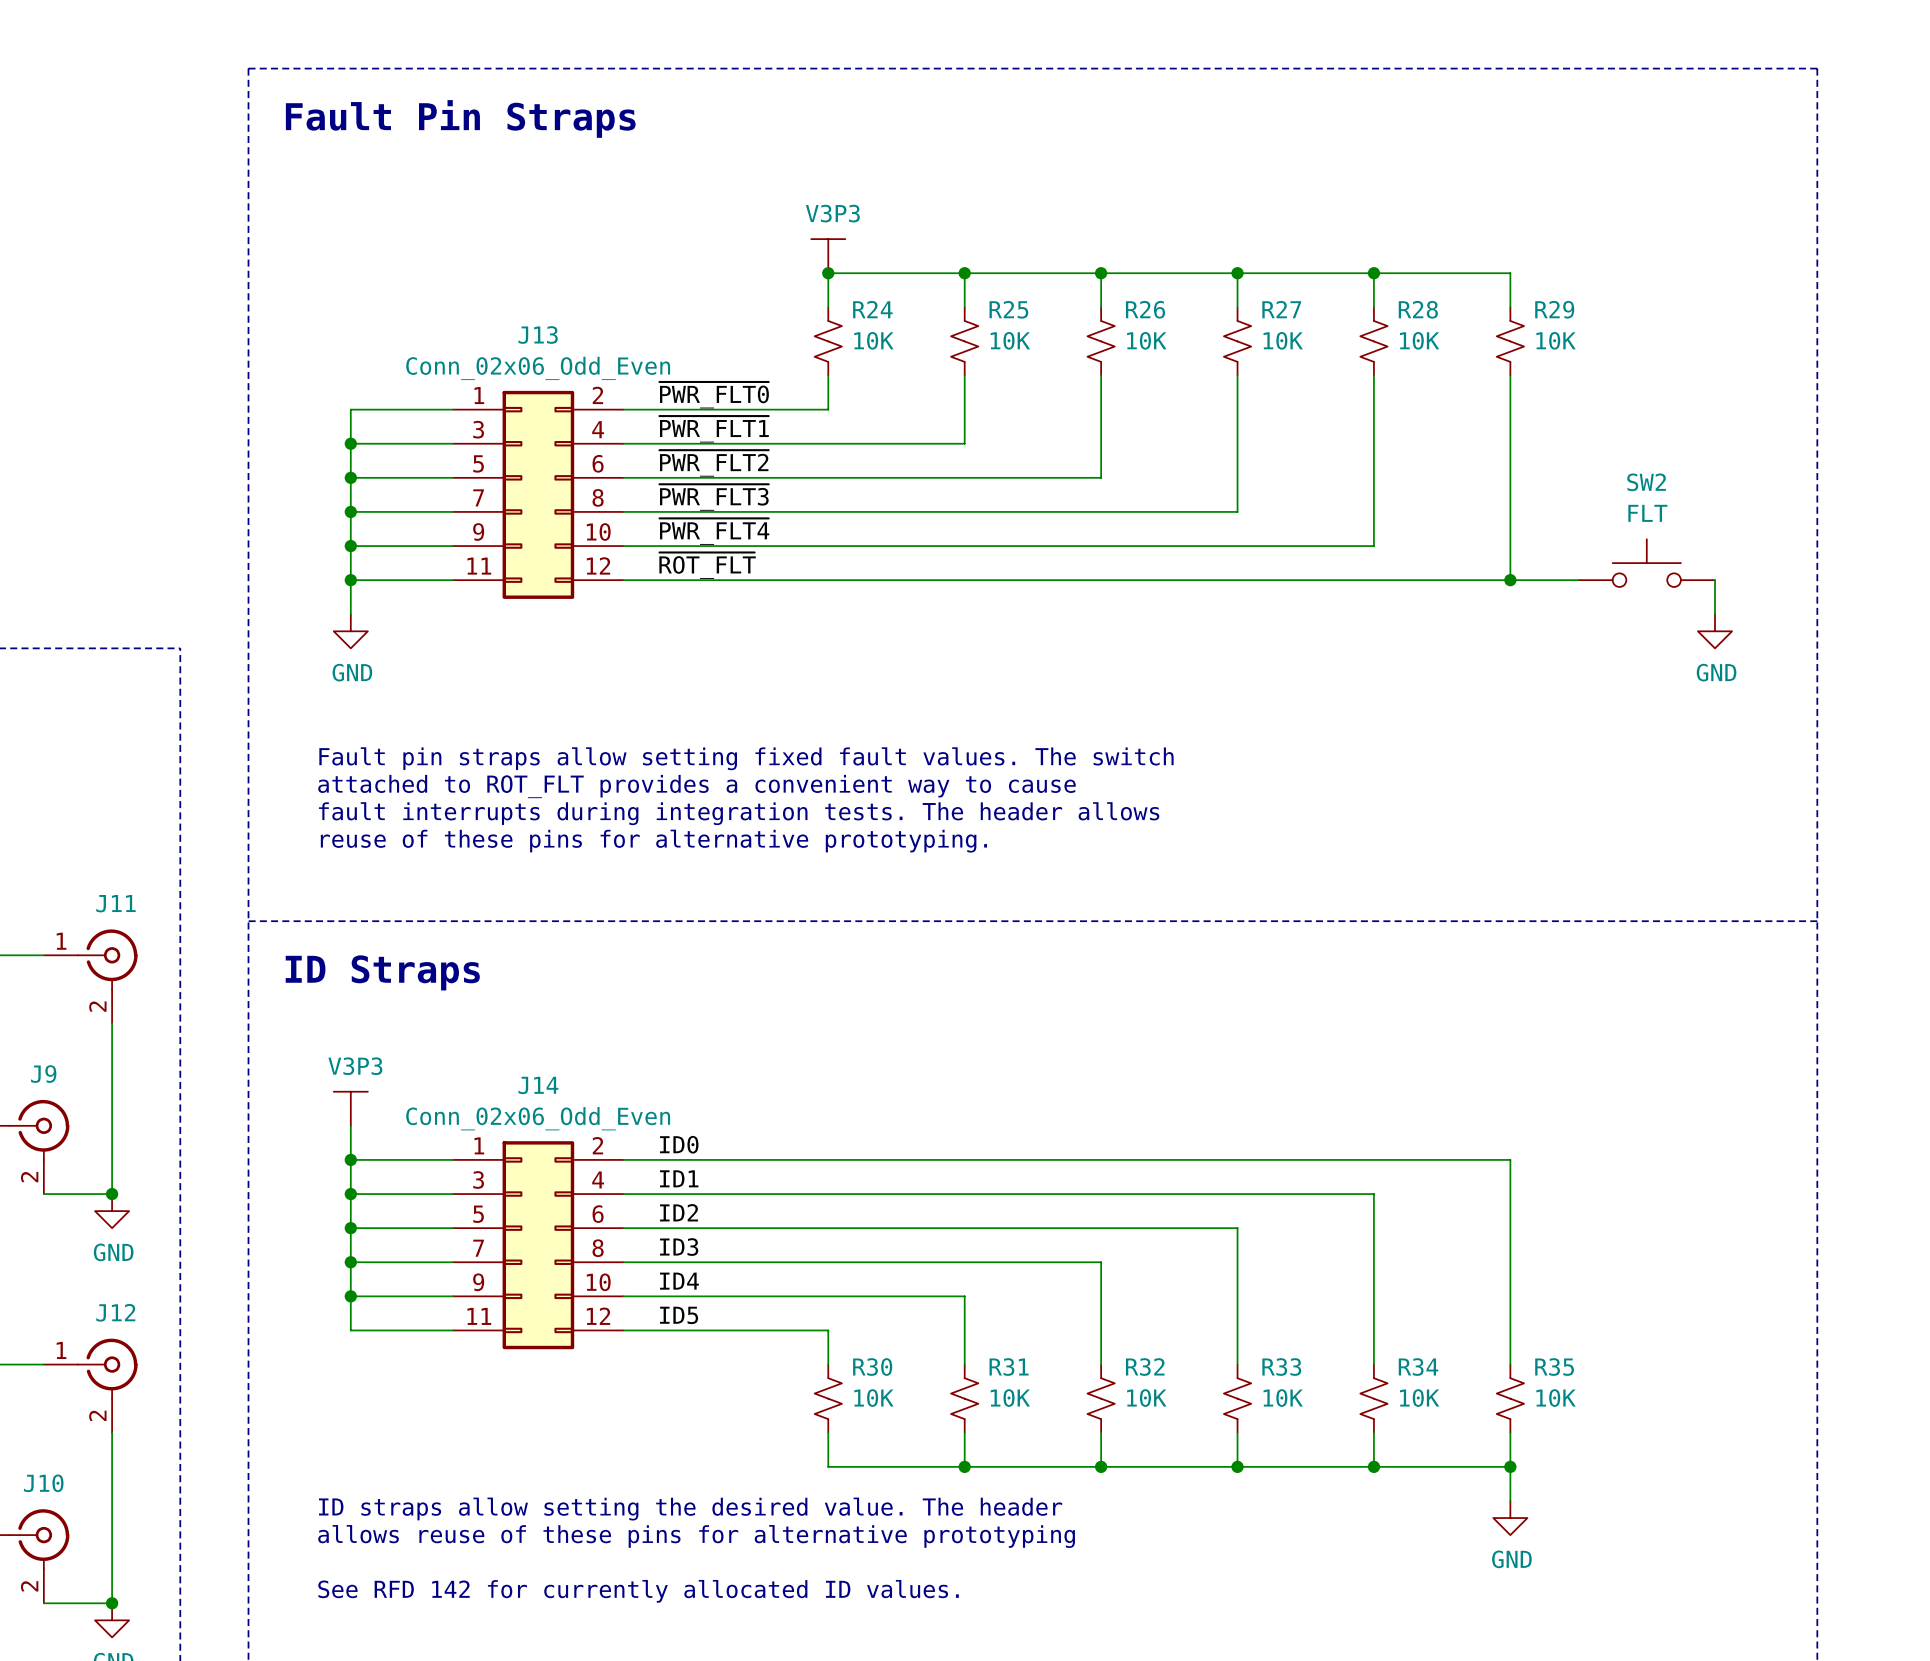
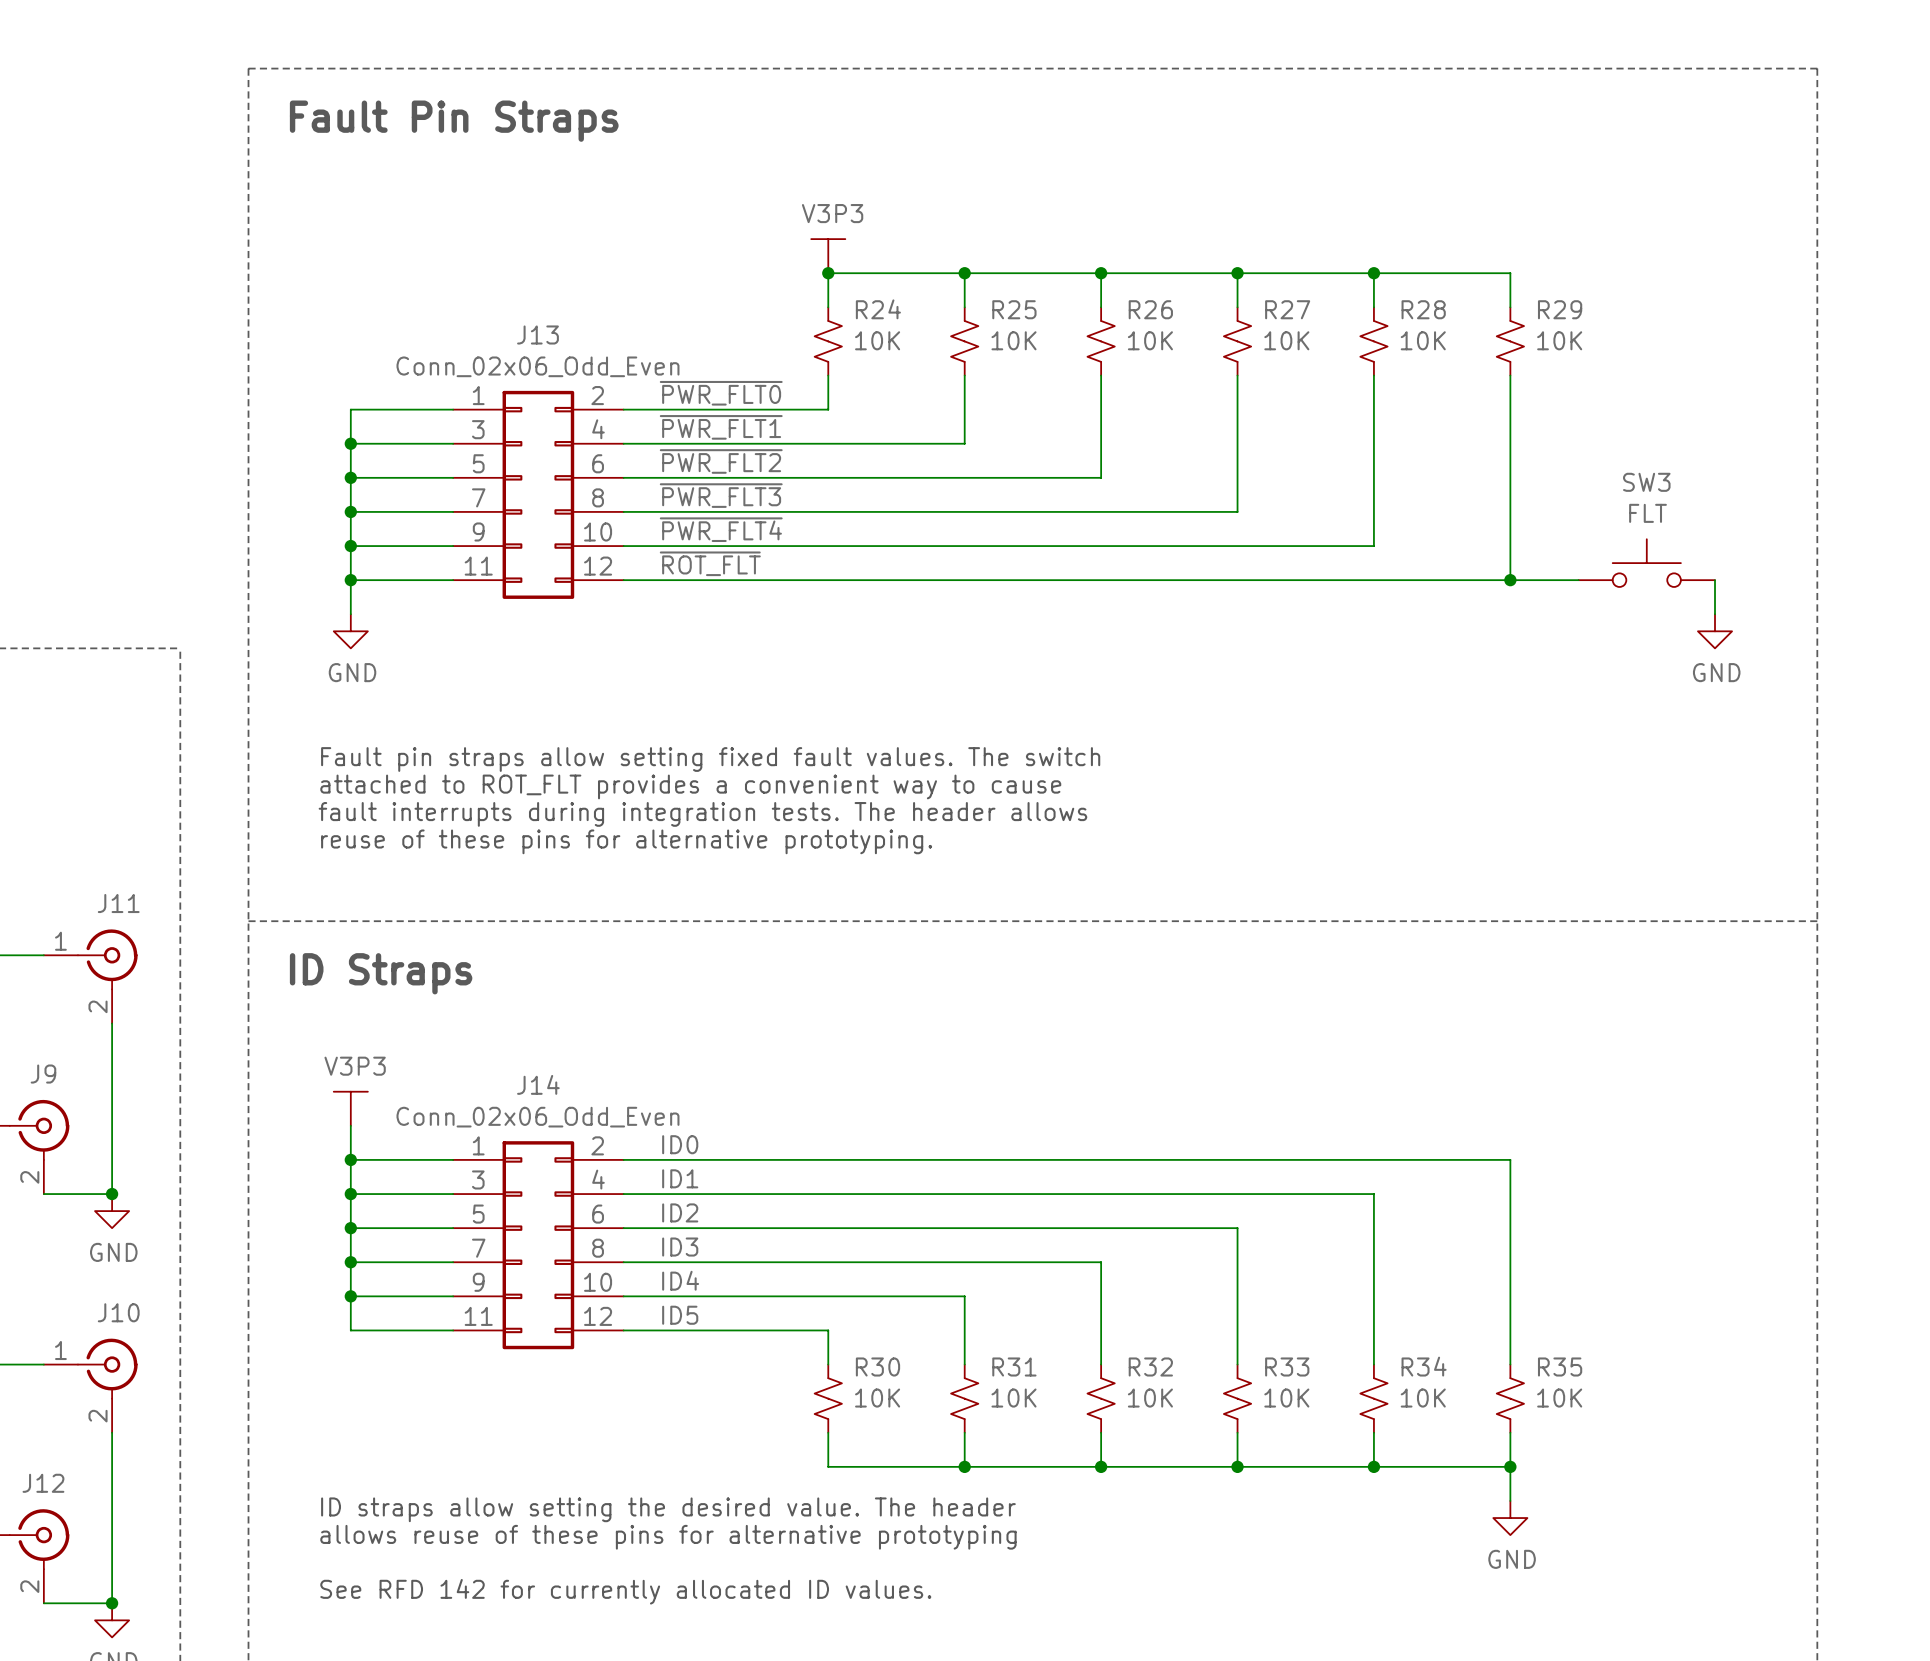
SW2 name: SW2 (1646, 482) -> SW3 (1646, 482)
J12 name: J12 (115, 1312) -> J10 (118, 1312)
J10 name: J10 (43, 1483) -> J12 (43, 1483)

